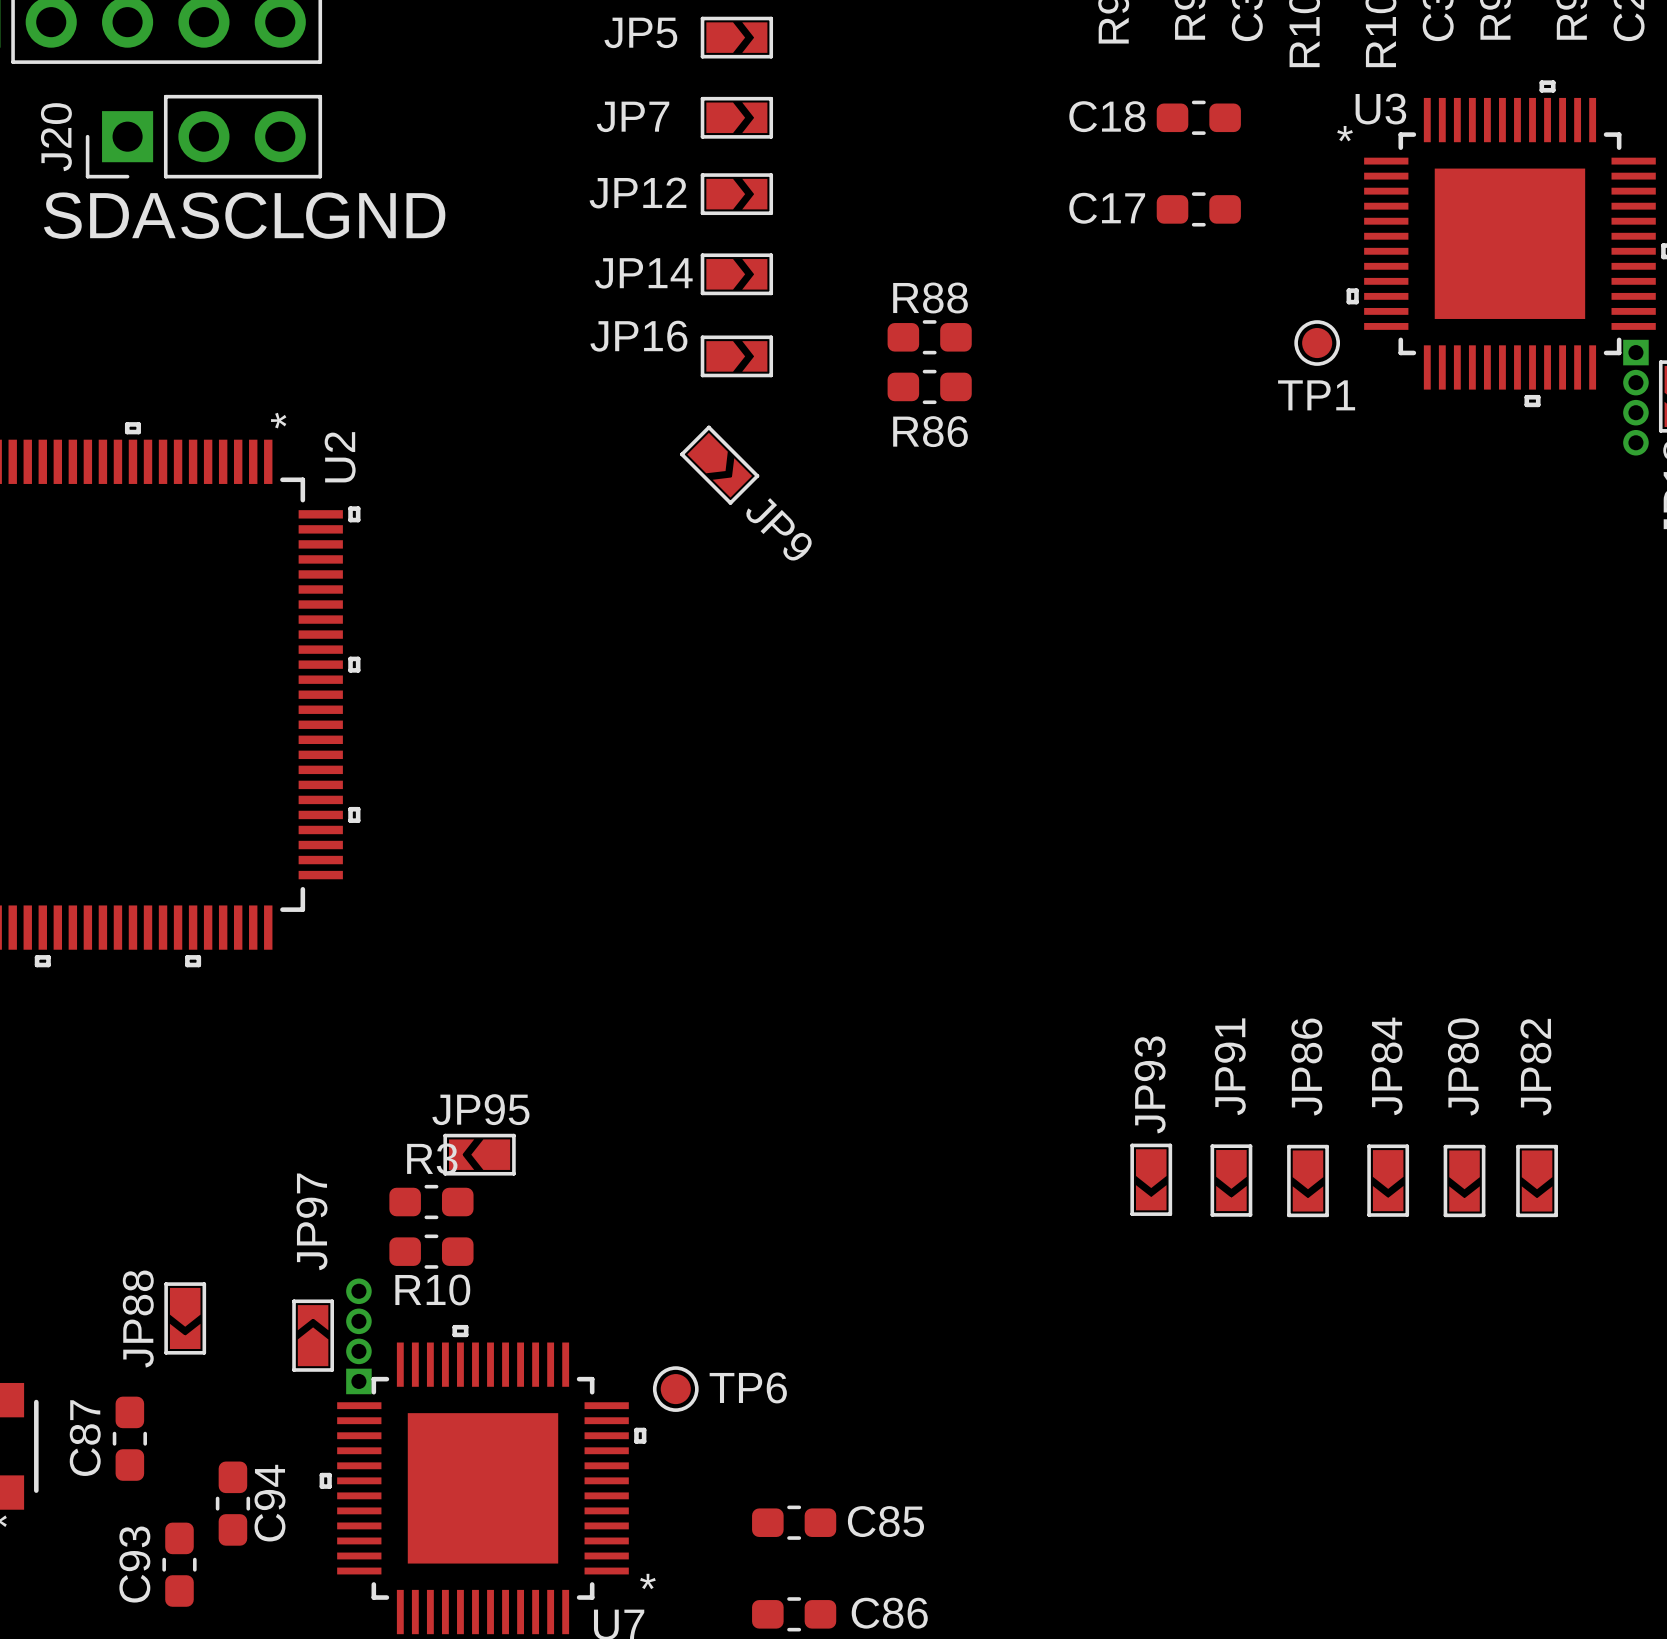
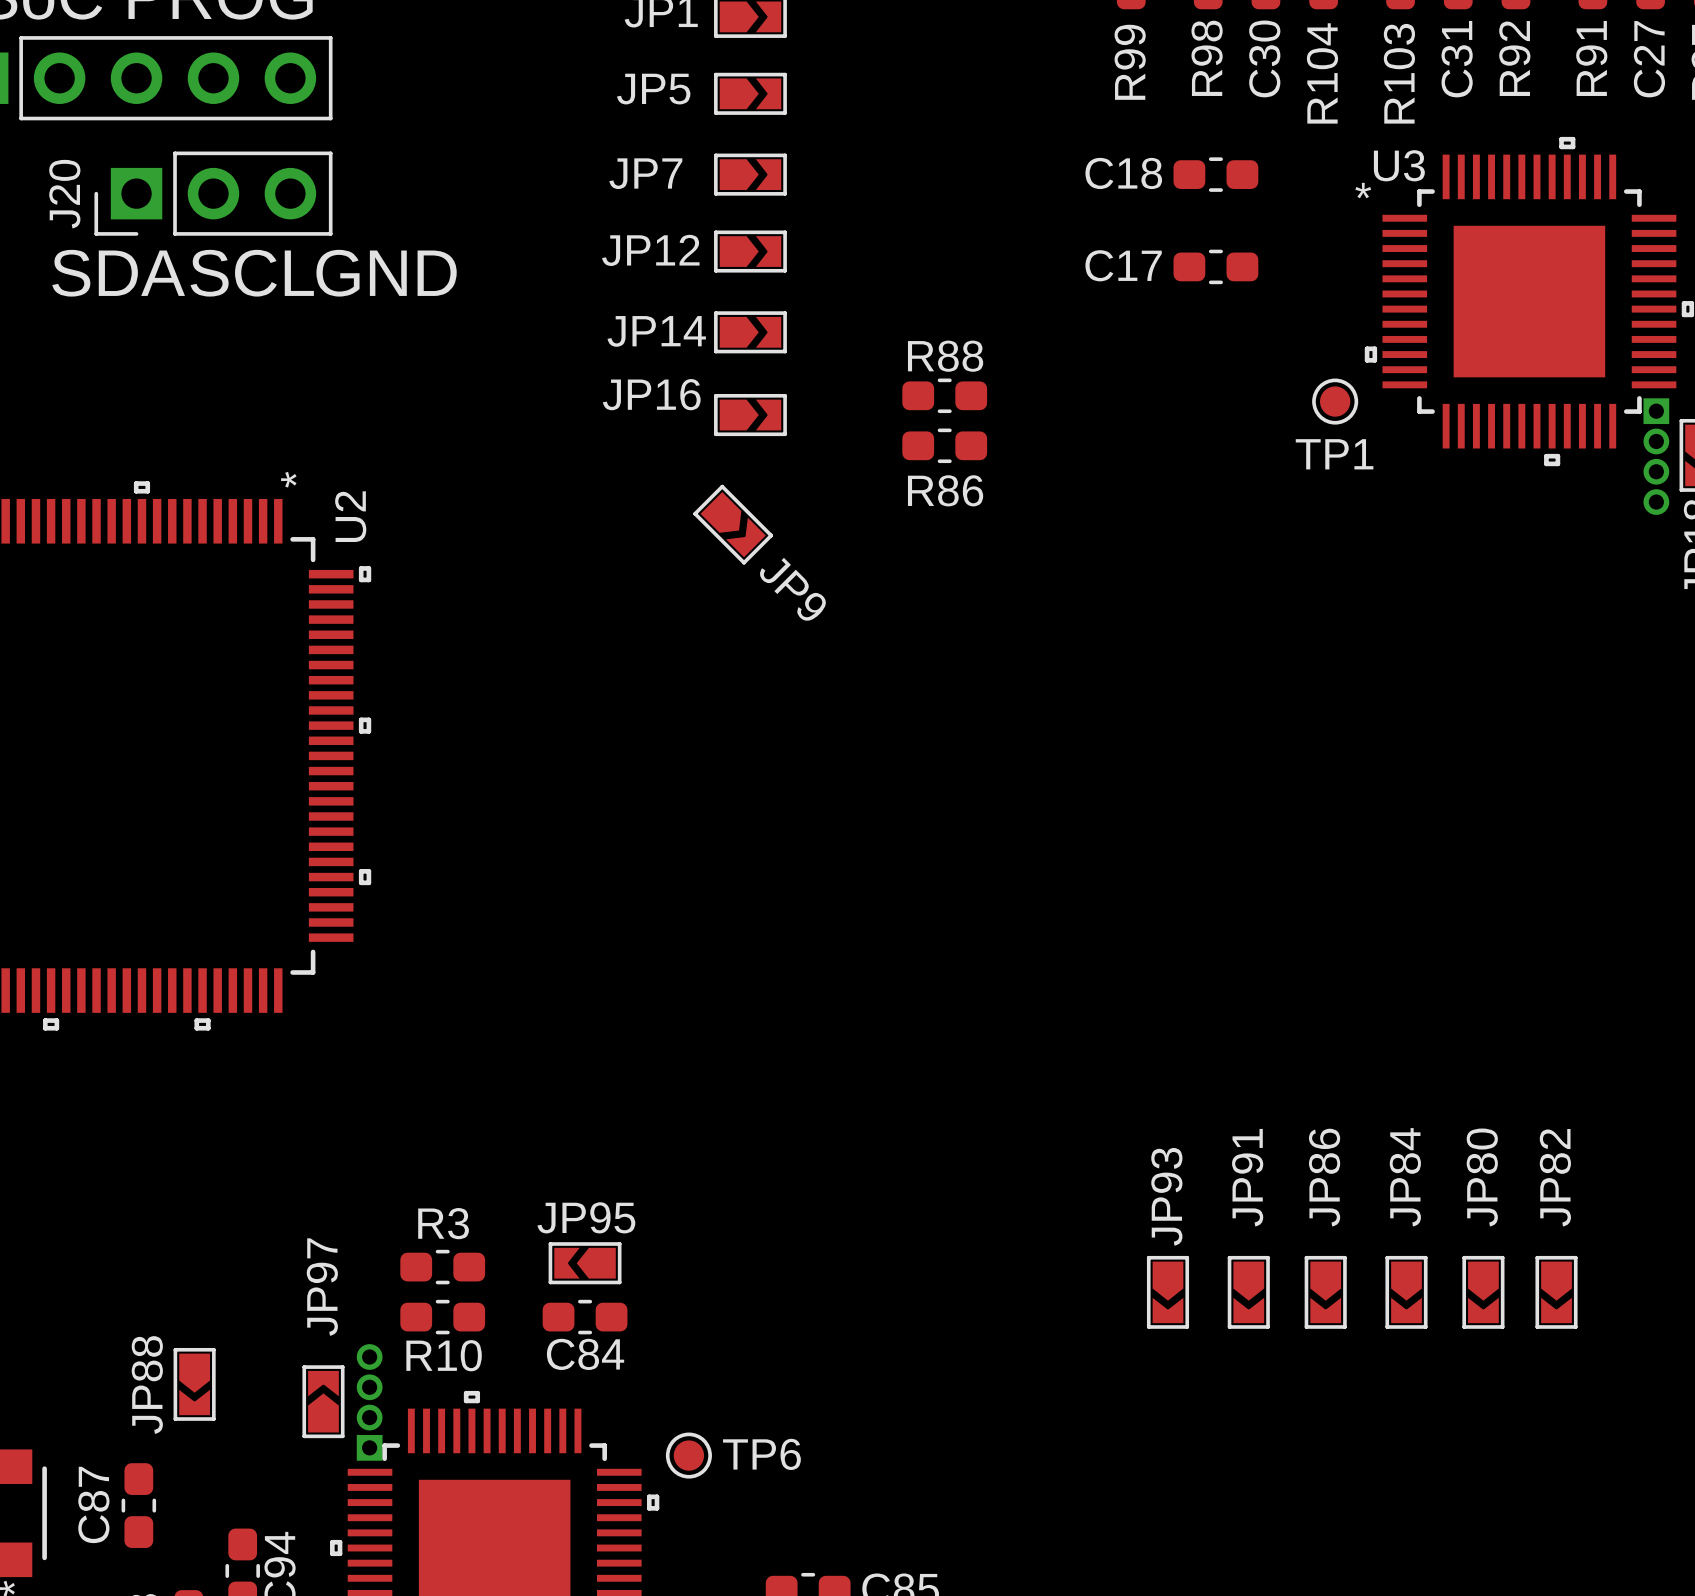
JP95 position: (479, 1154) -> (585, 1263)
JP93 position: (1151, 1179) -> (1167, 1292)
JP91 position: (1231, 1180) -> (1248, 1292)
JP86 position: (1308, 1180) -> (1325, 1292)
JP84 position: (1388, 1180) -> (1406, 1292)
JP80 position: (1464, 1180) -> (1483, 1292)
JP82 position: (1537, 1180) -> (1556, 1292)
C84: none -> (585, 1317)

